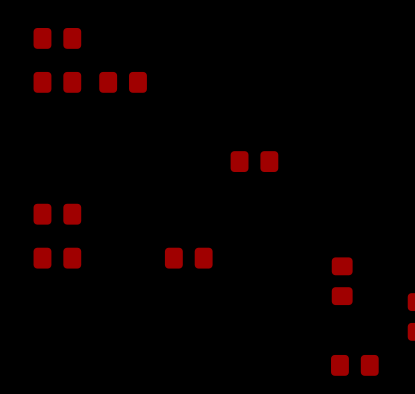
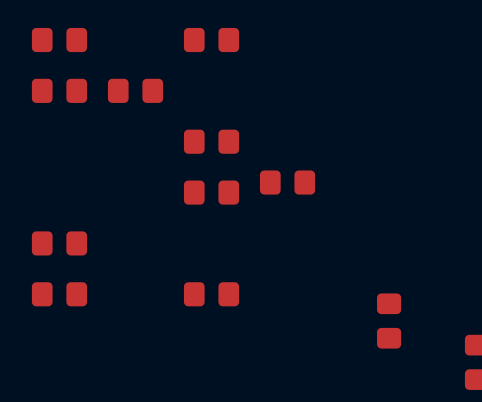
part: none -> (211, 40)
part: none -> (211, 141)
part: none -> (211, 192)

